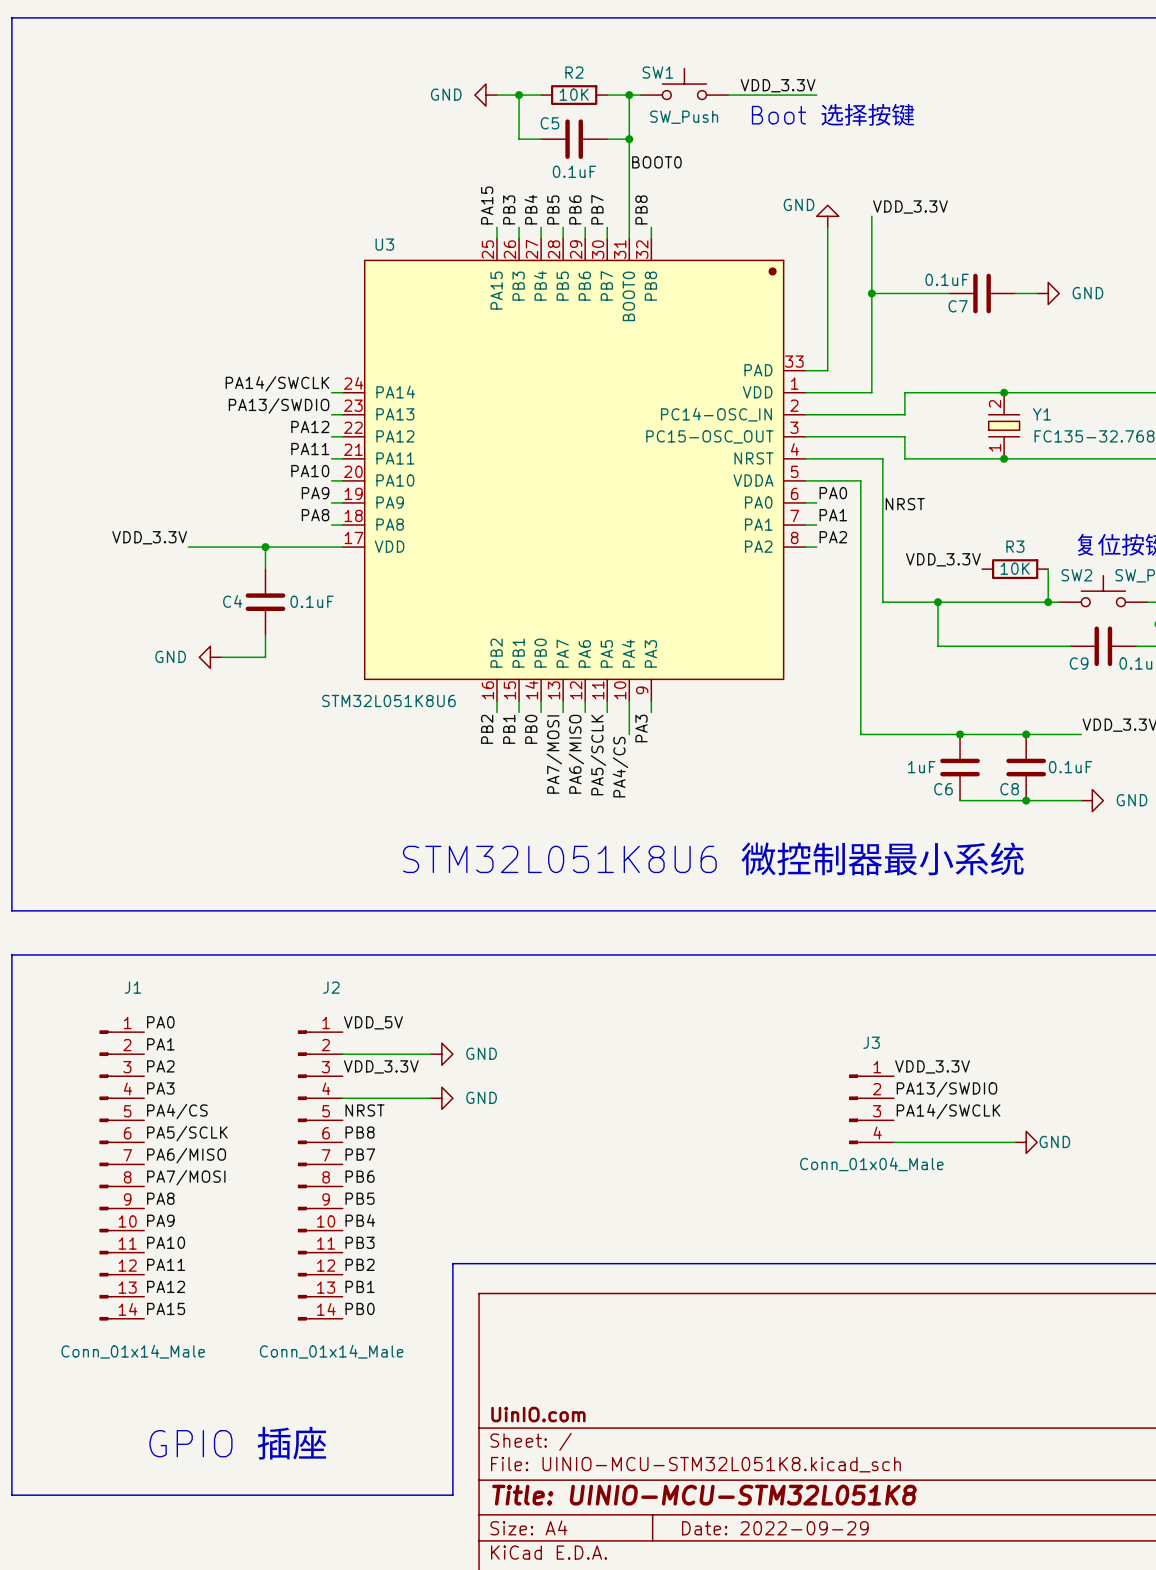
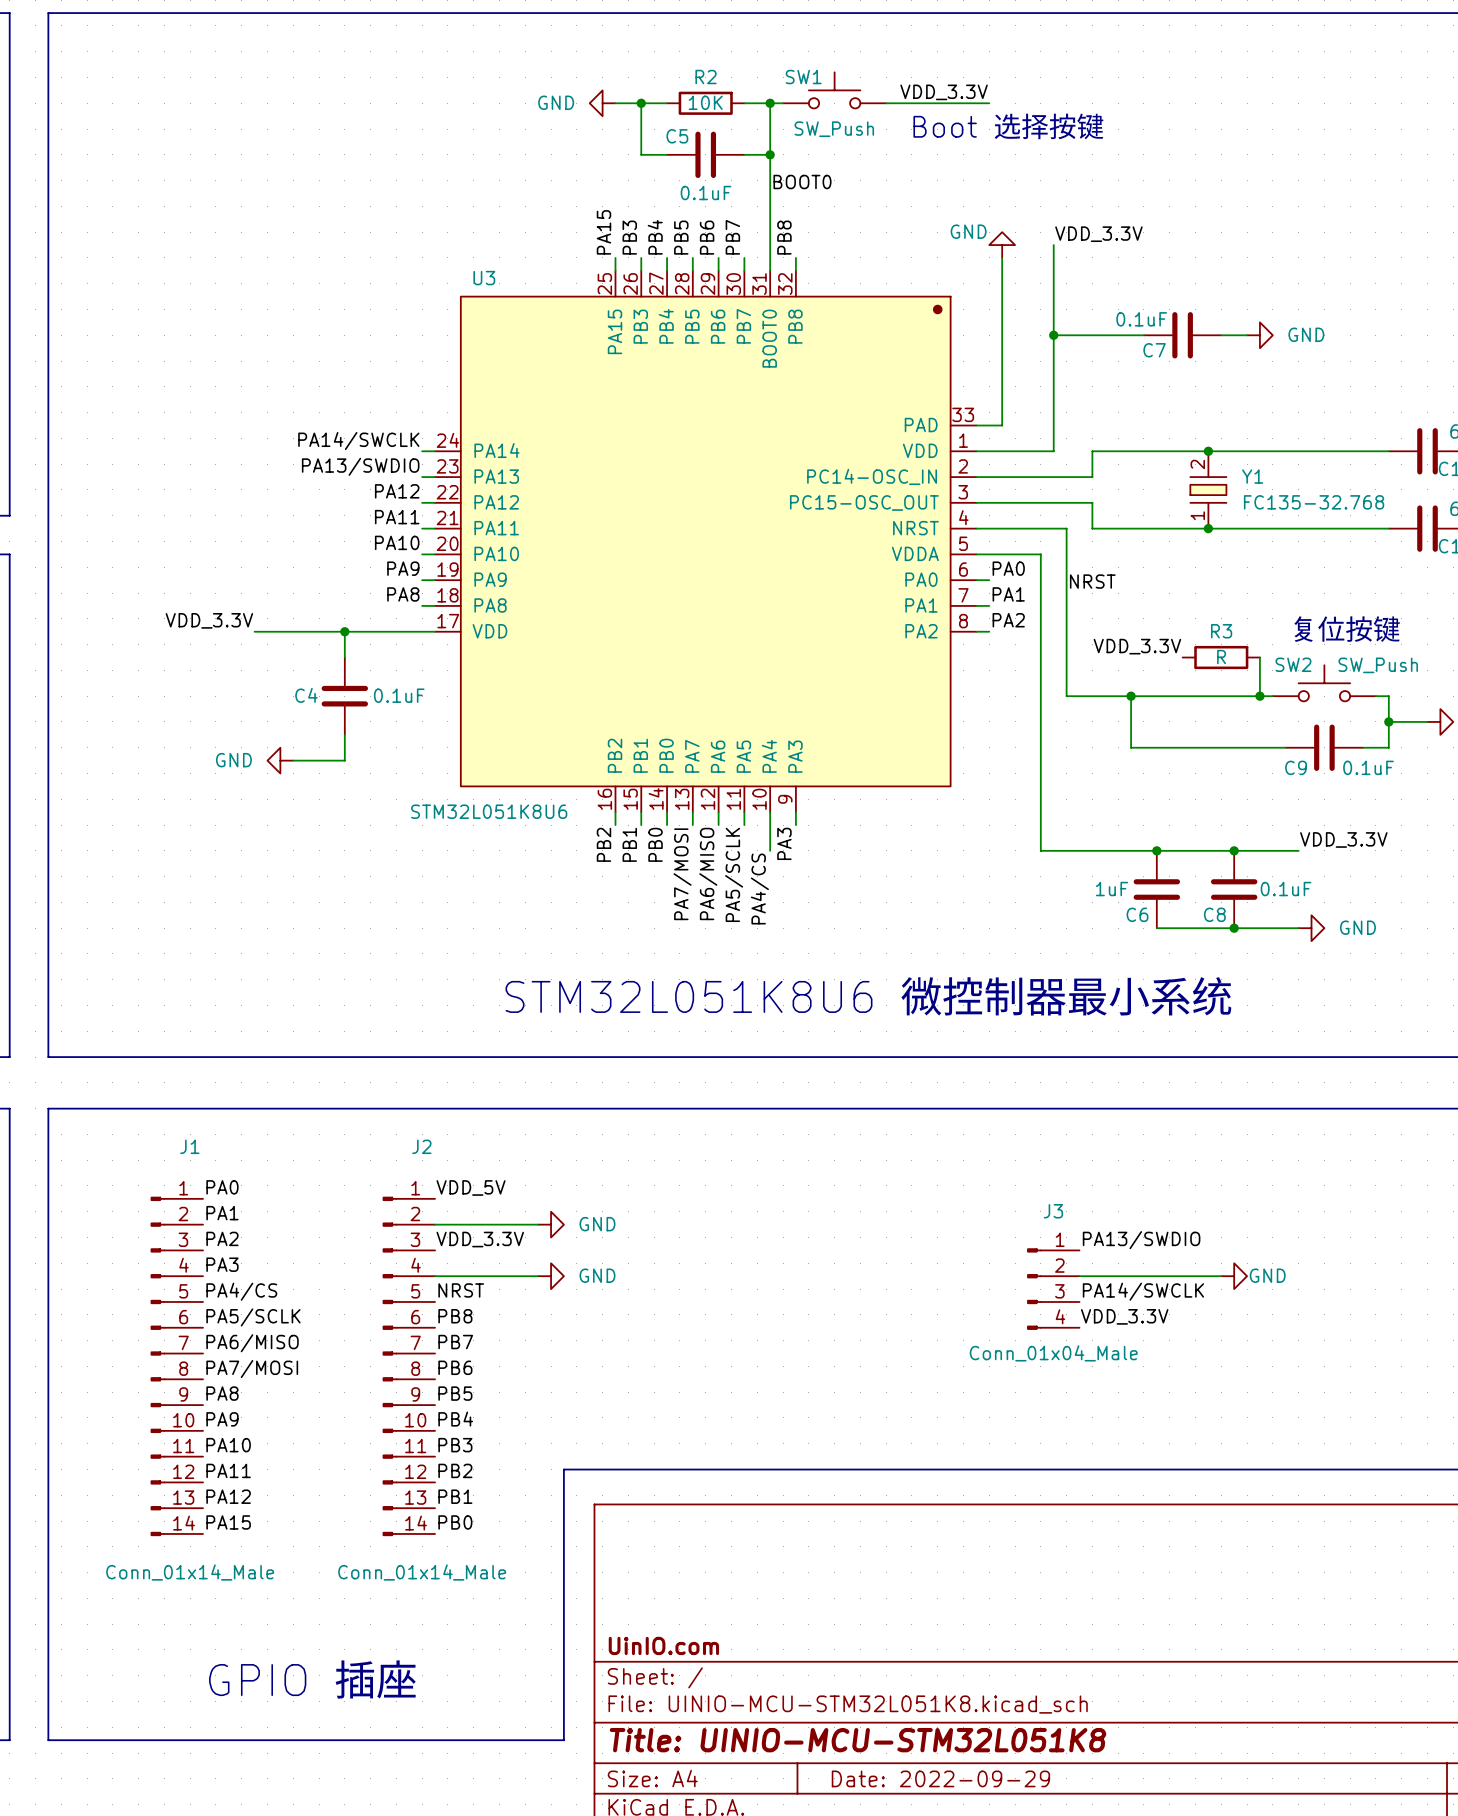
R3 value: 10K (1015, 568) -> R (1221, 657)
label: VDD_3.3V (932, 1066) -> PA13/SWDIO (1141, 1240)
label: PA13/SWDIO (946, 1089) -> none
label: none -> VDD_3.3V (1124, 1316)
wire: (893, 1142) (1015, 1142) -> (1079, 1276) (1221, 1276)
power symbol position: GND (1026, 1142) -> GND (1234, 1276)

